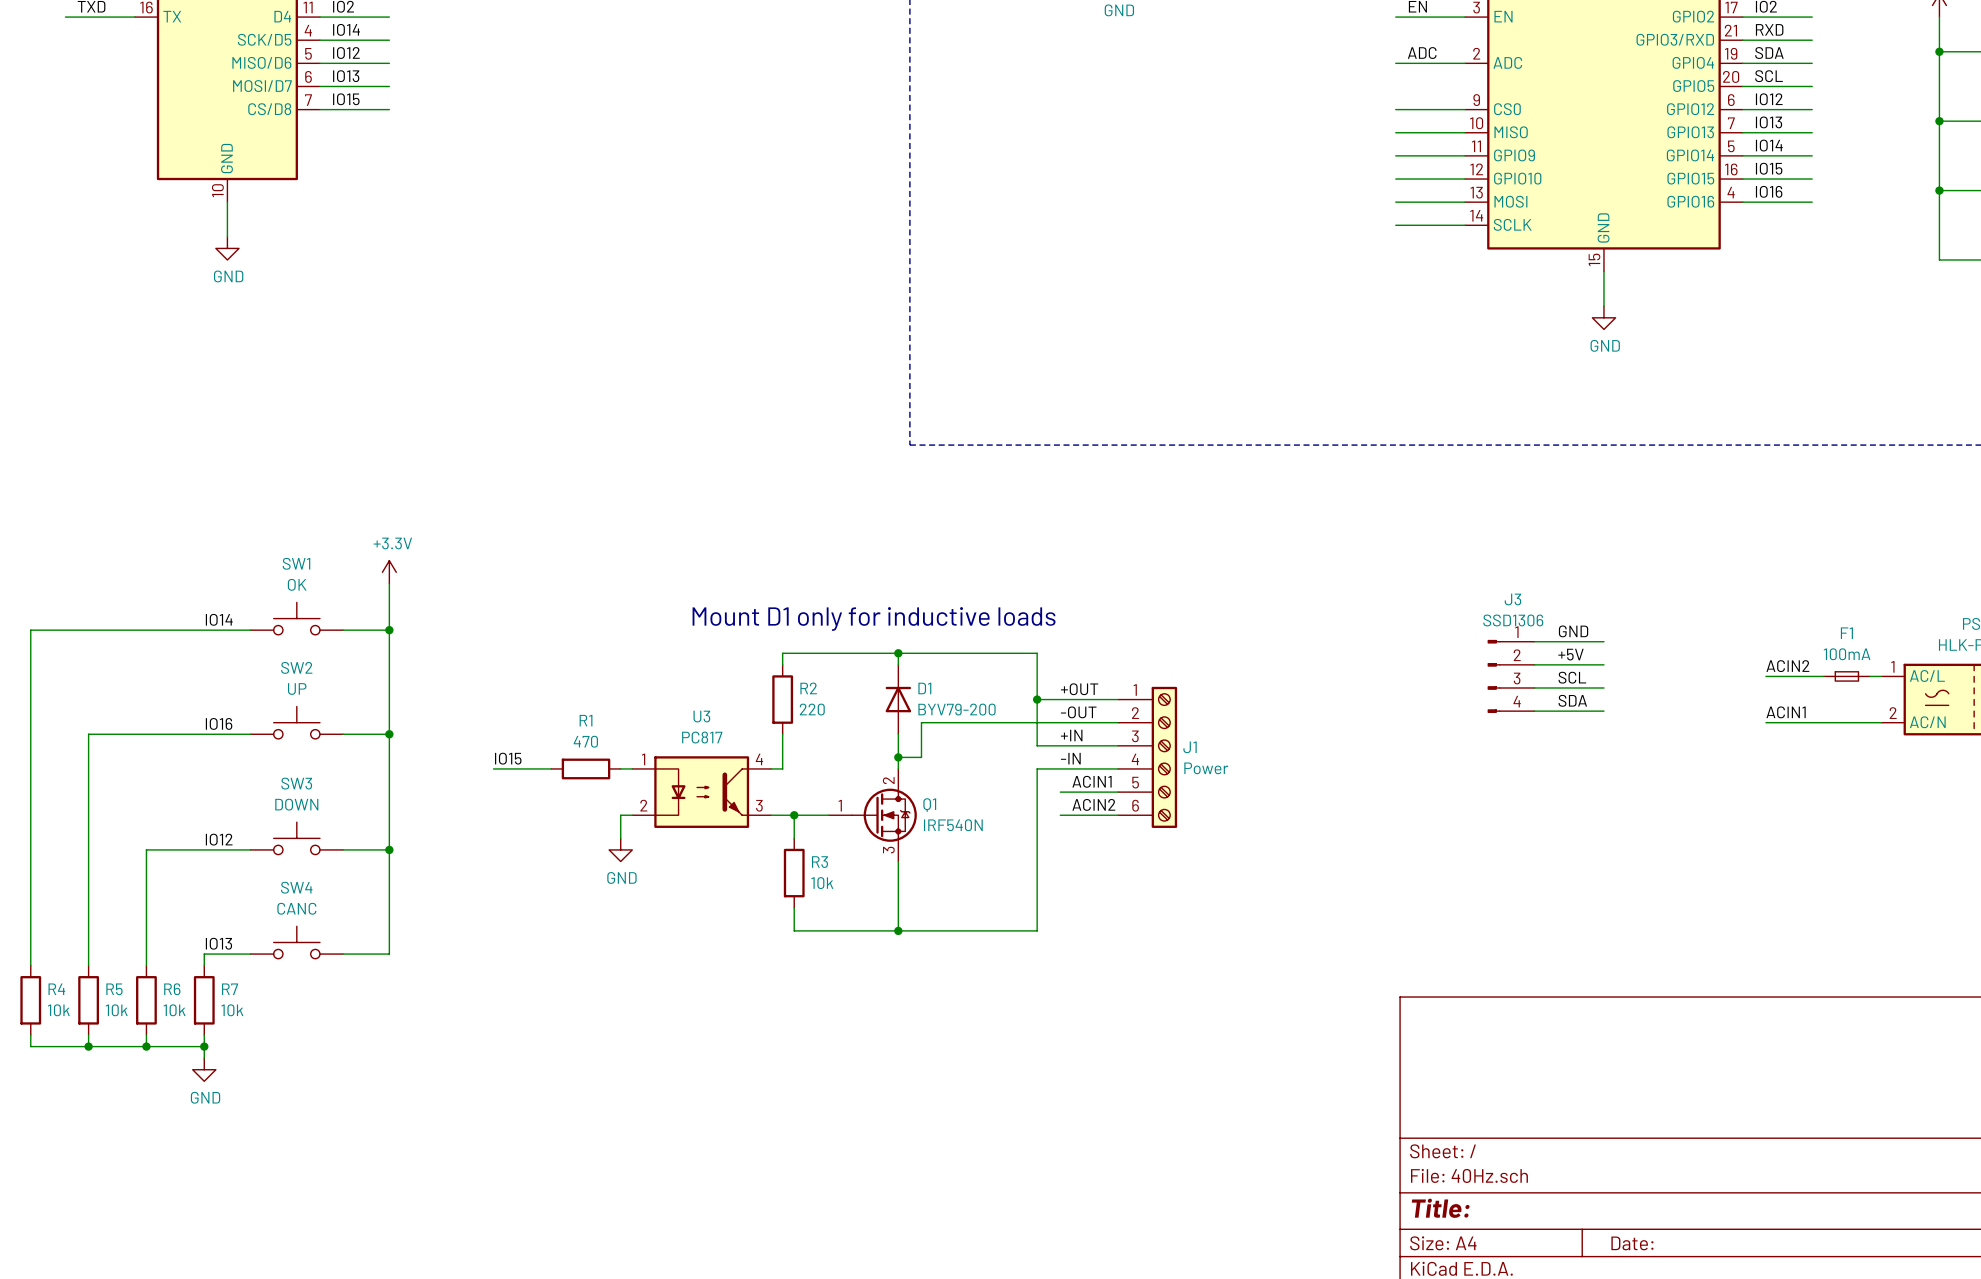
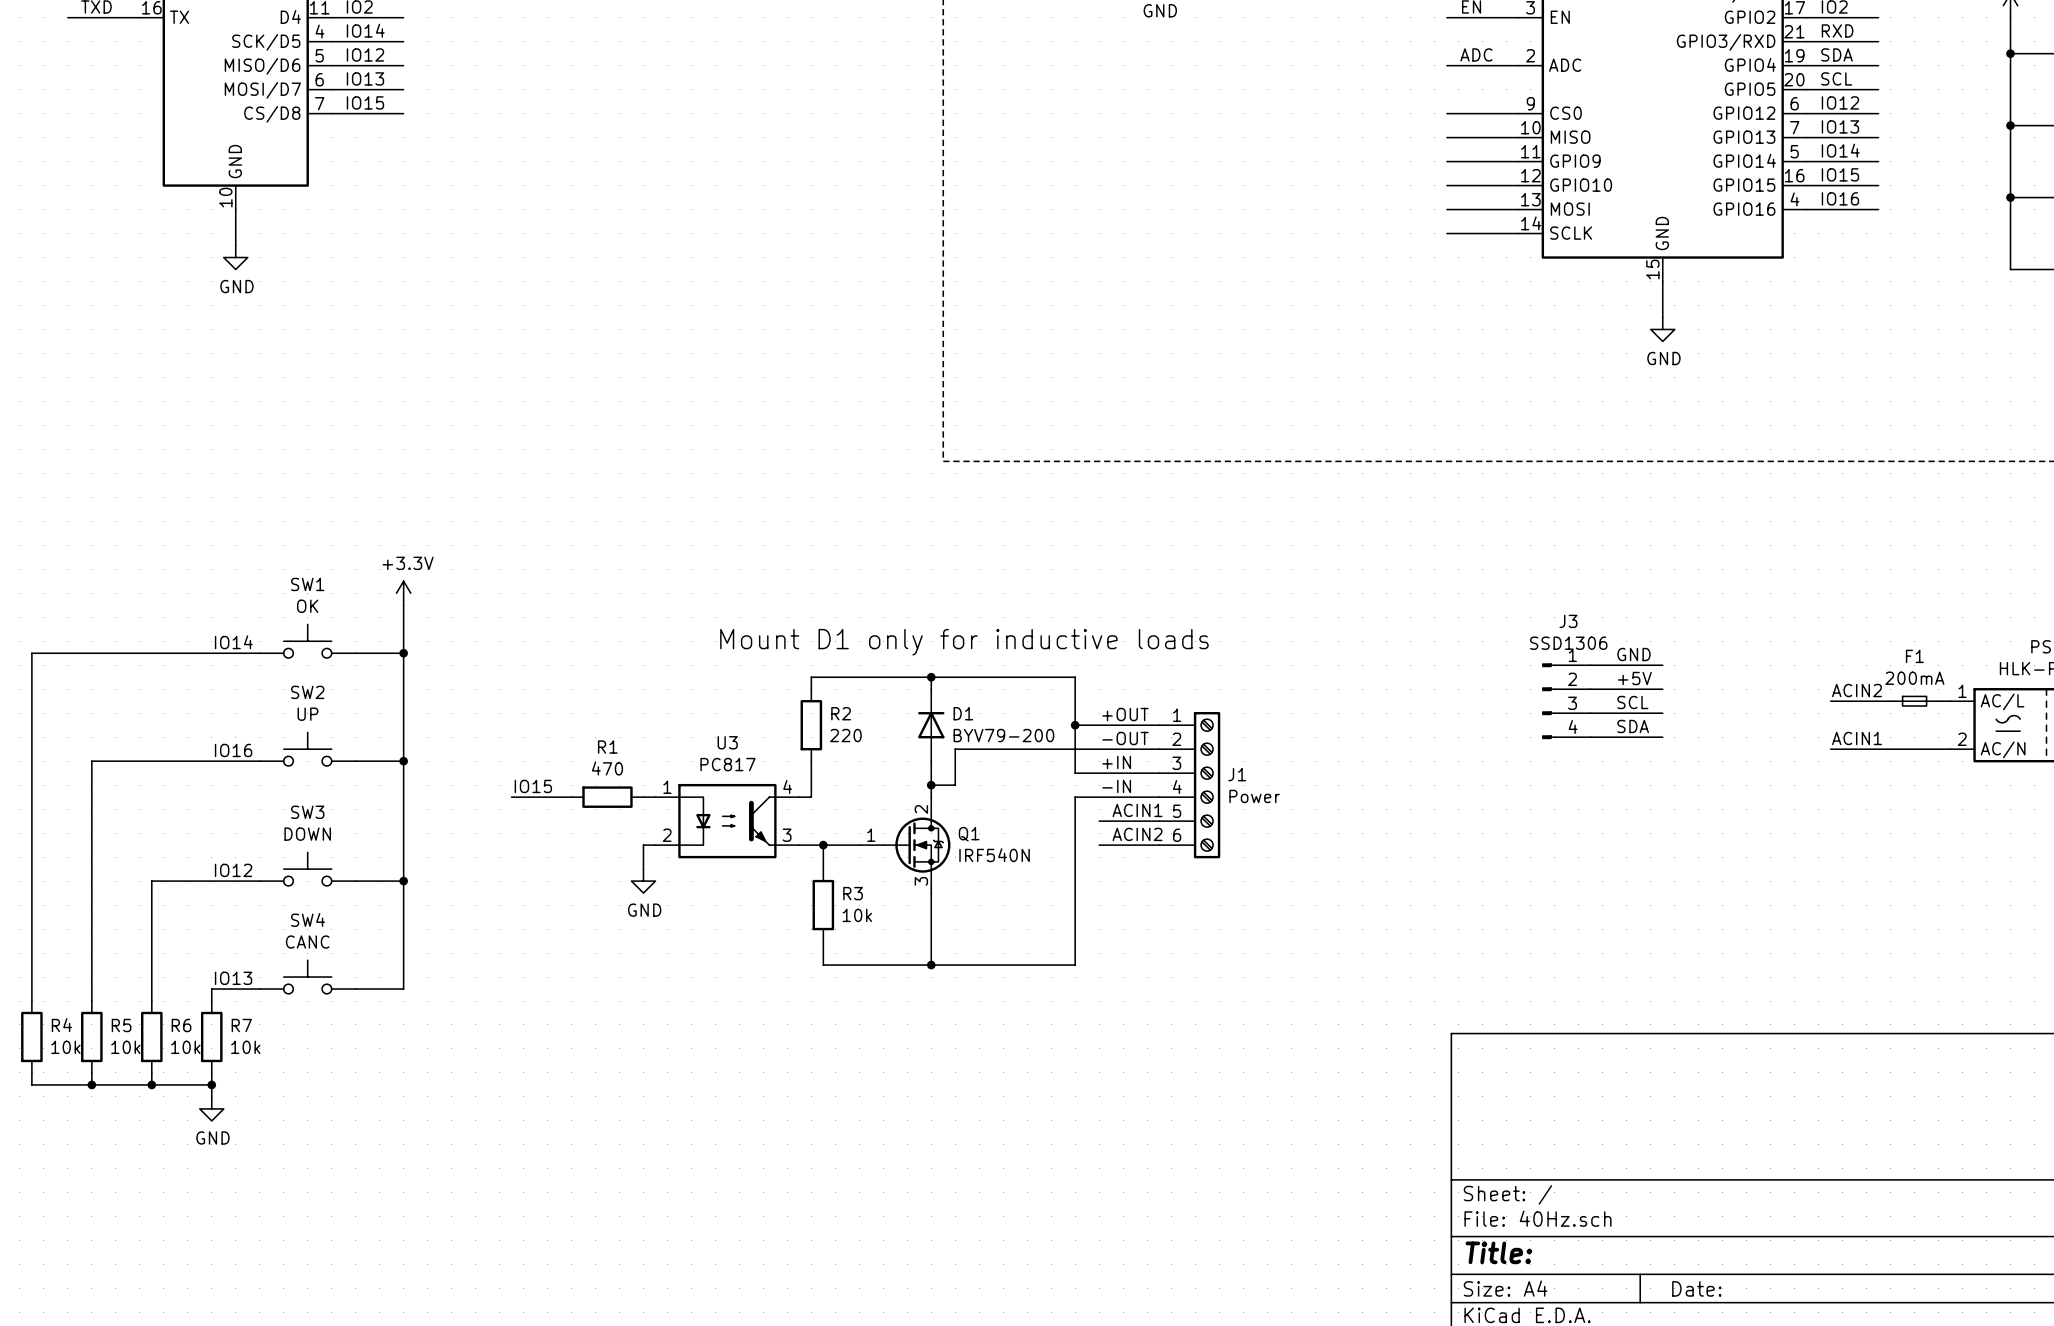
F1 value: 100mA (1847, 654) -> 200mA (1914, 678)

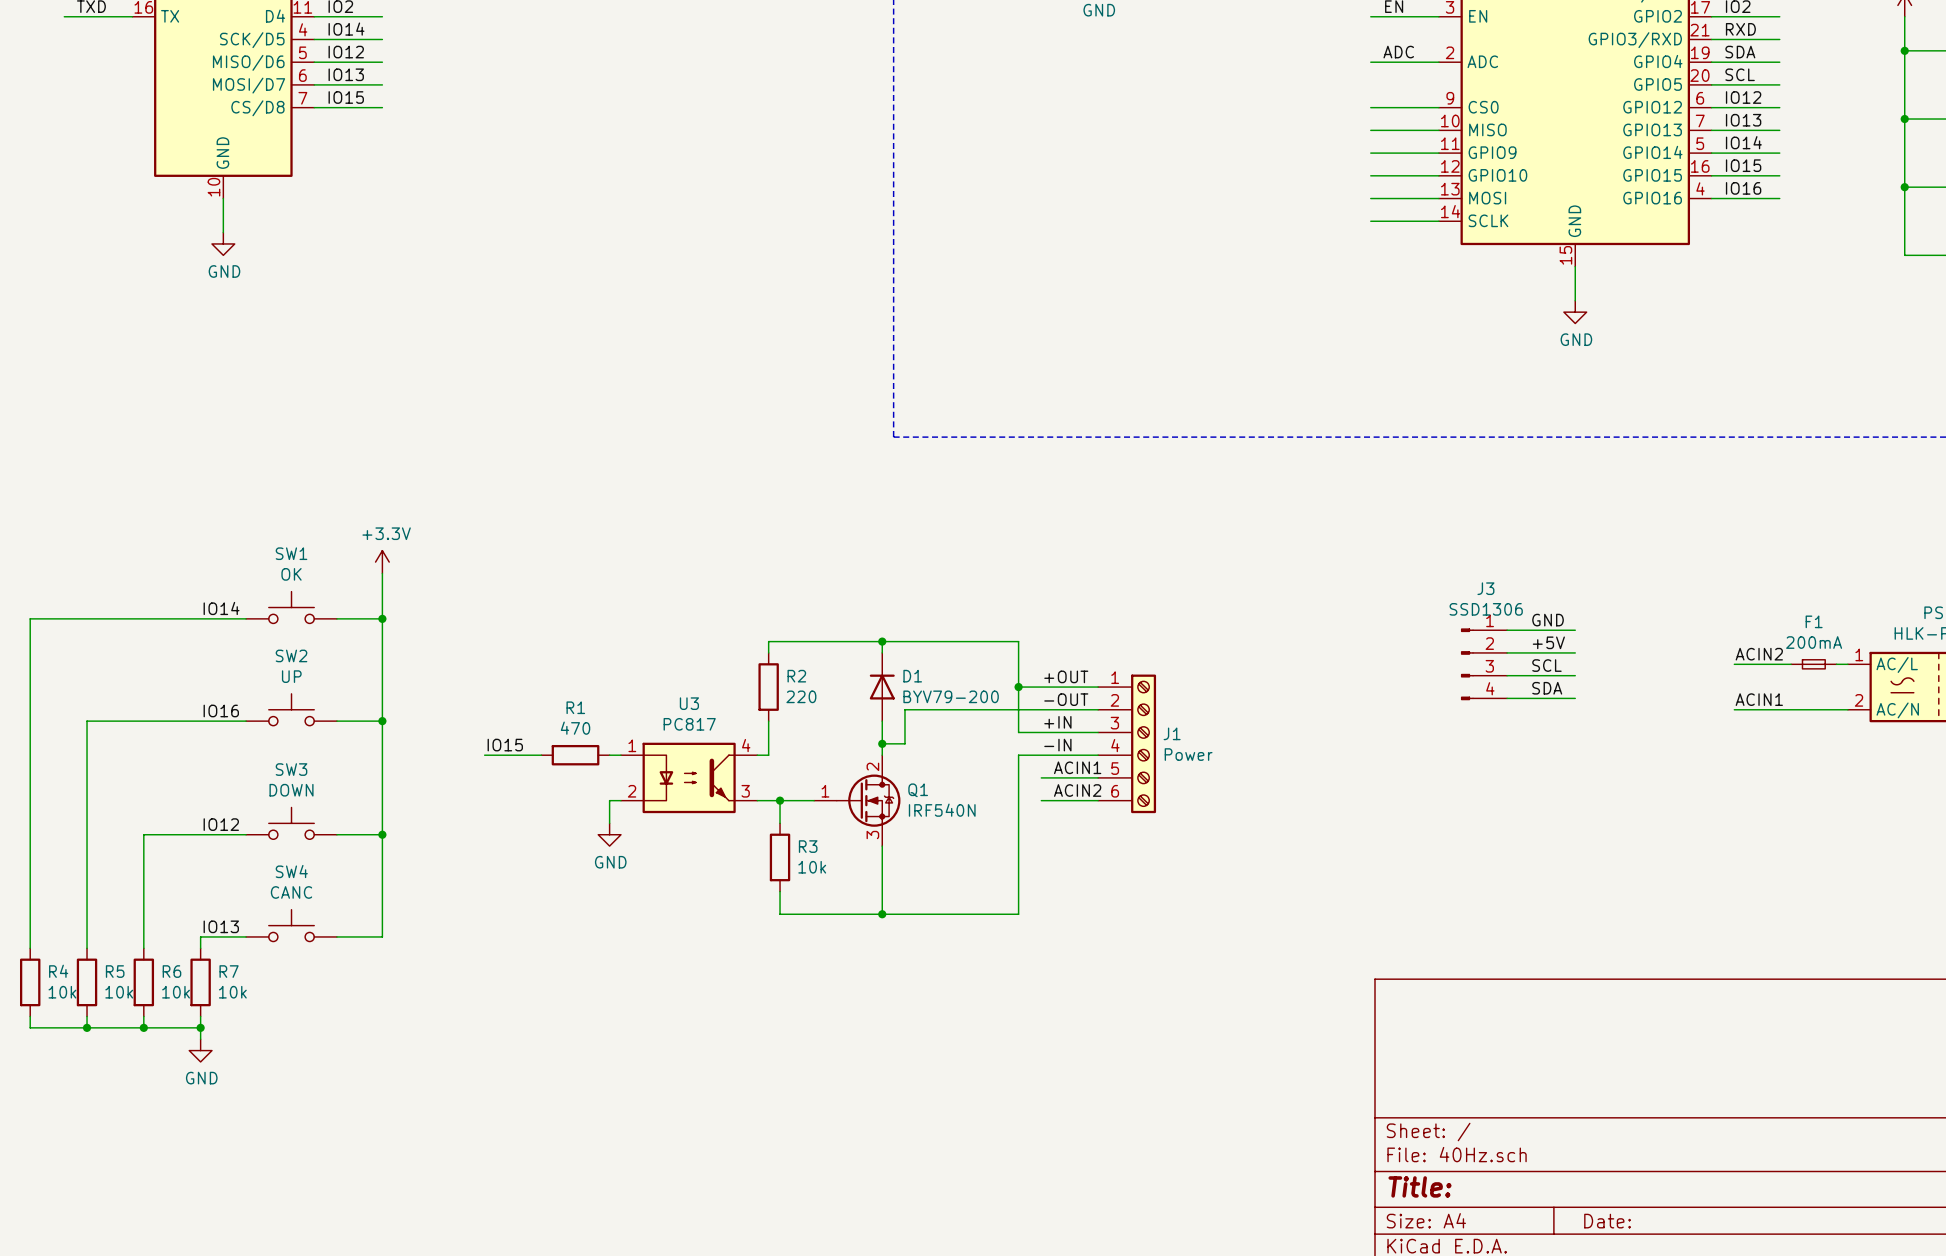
text: Mount D1 only for inductive loads (964, 642) -> none

